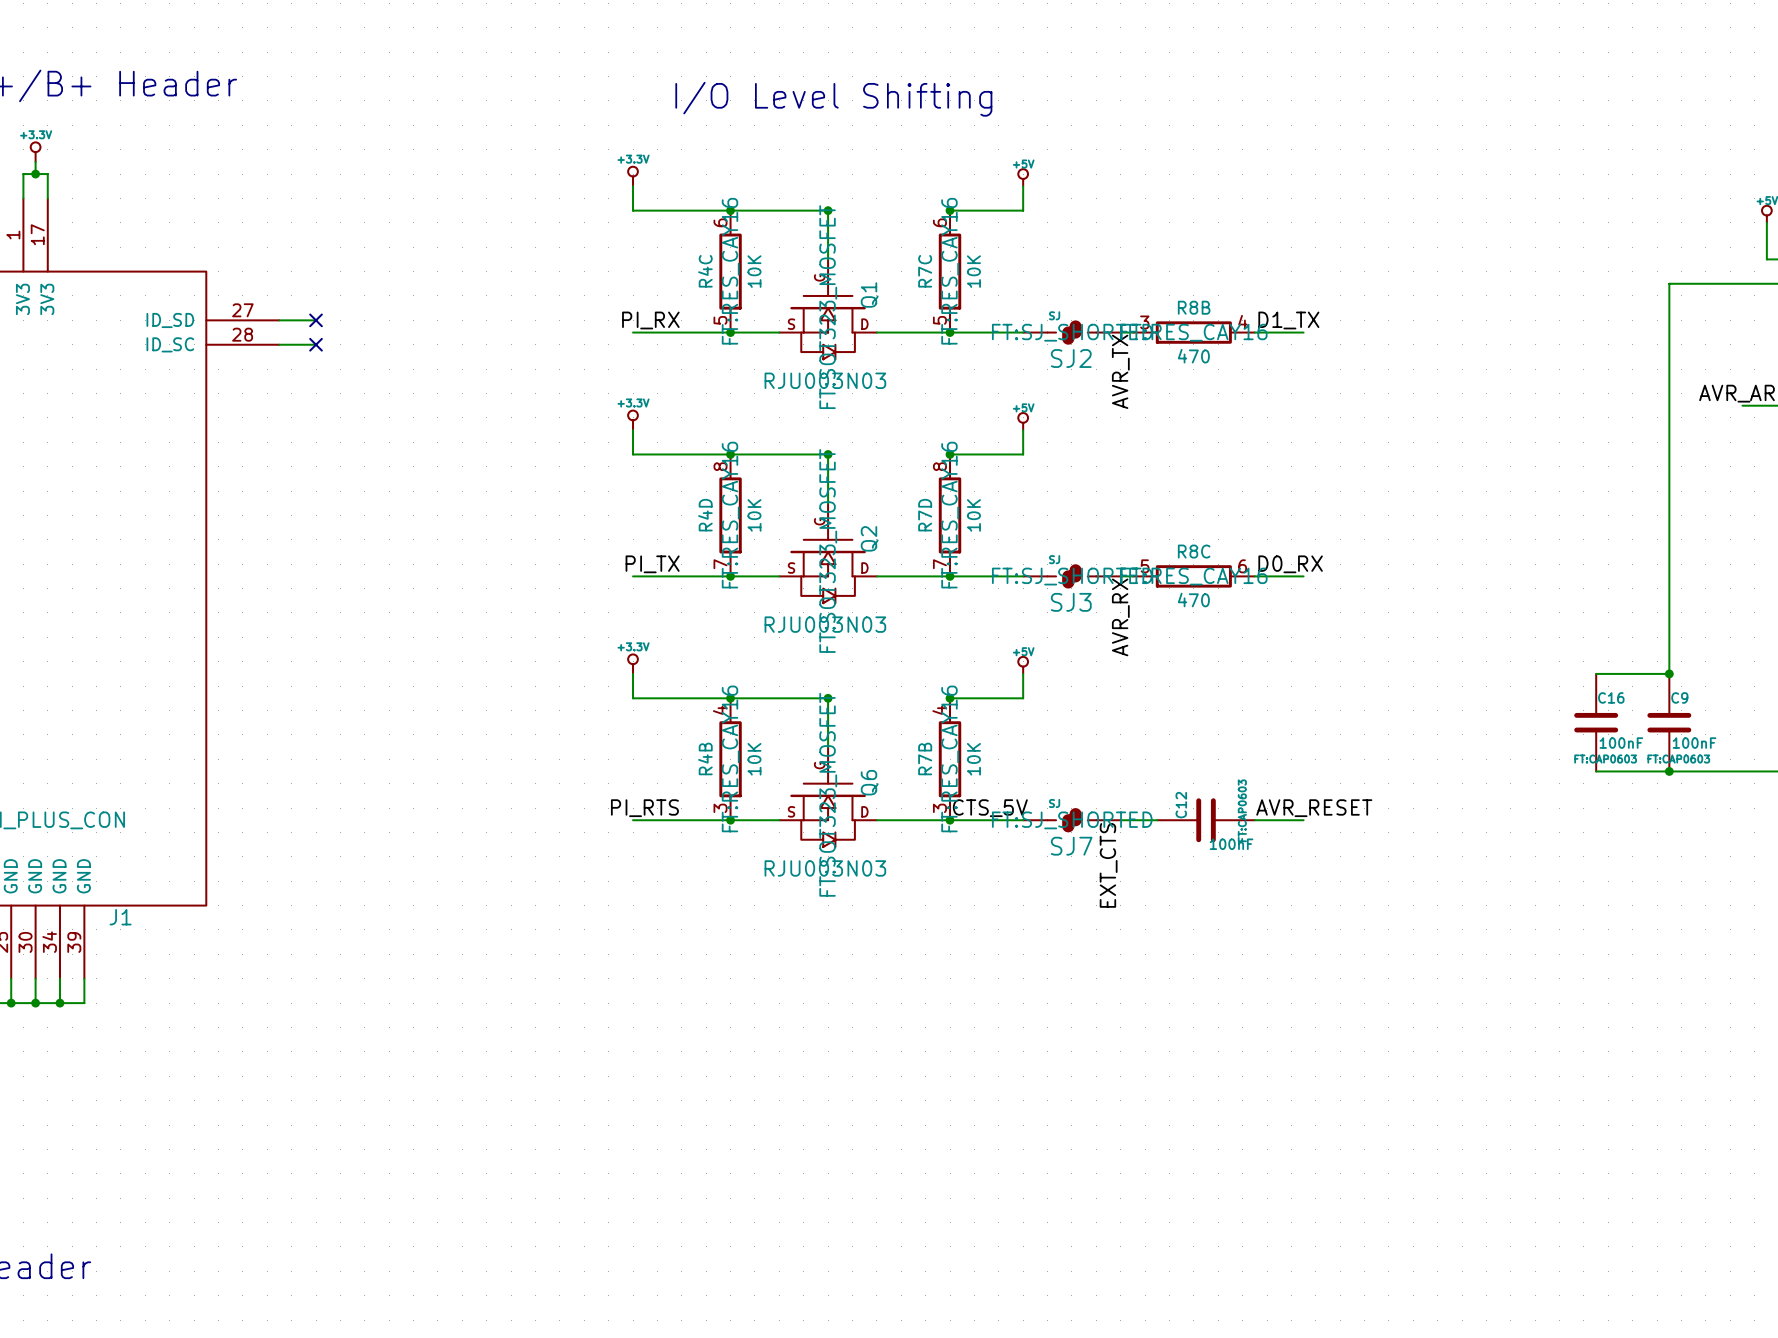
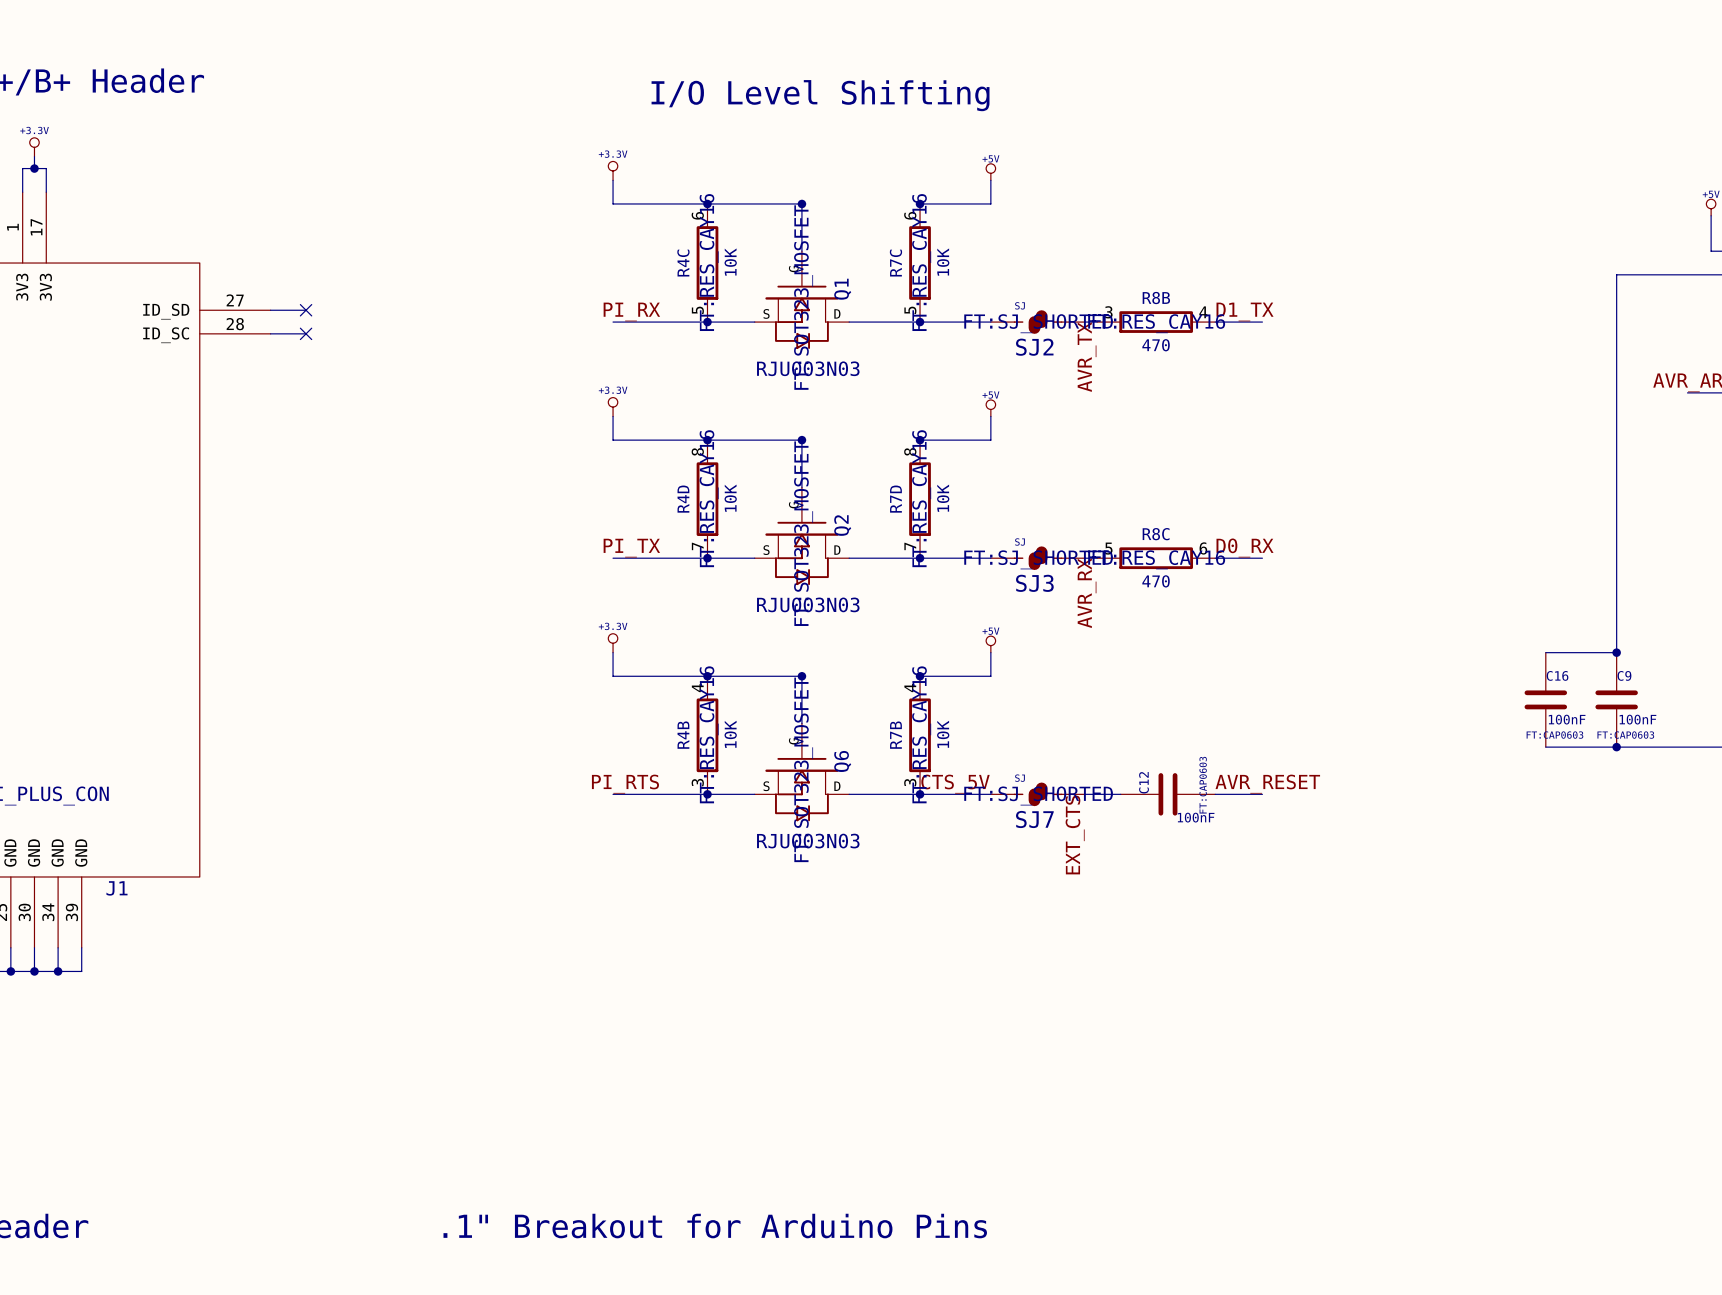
text: none -> .1" Breakout for Arduino Pins (715, 1226)

